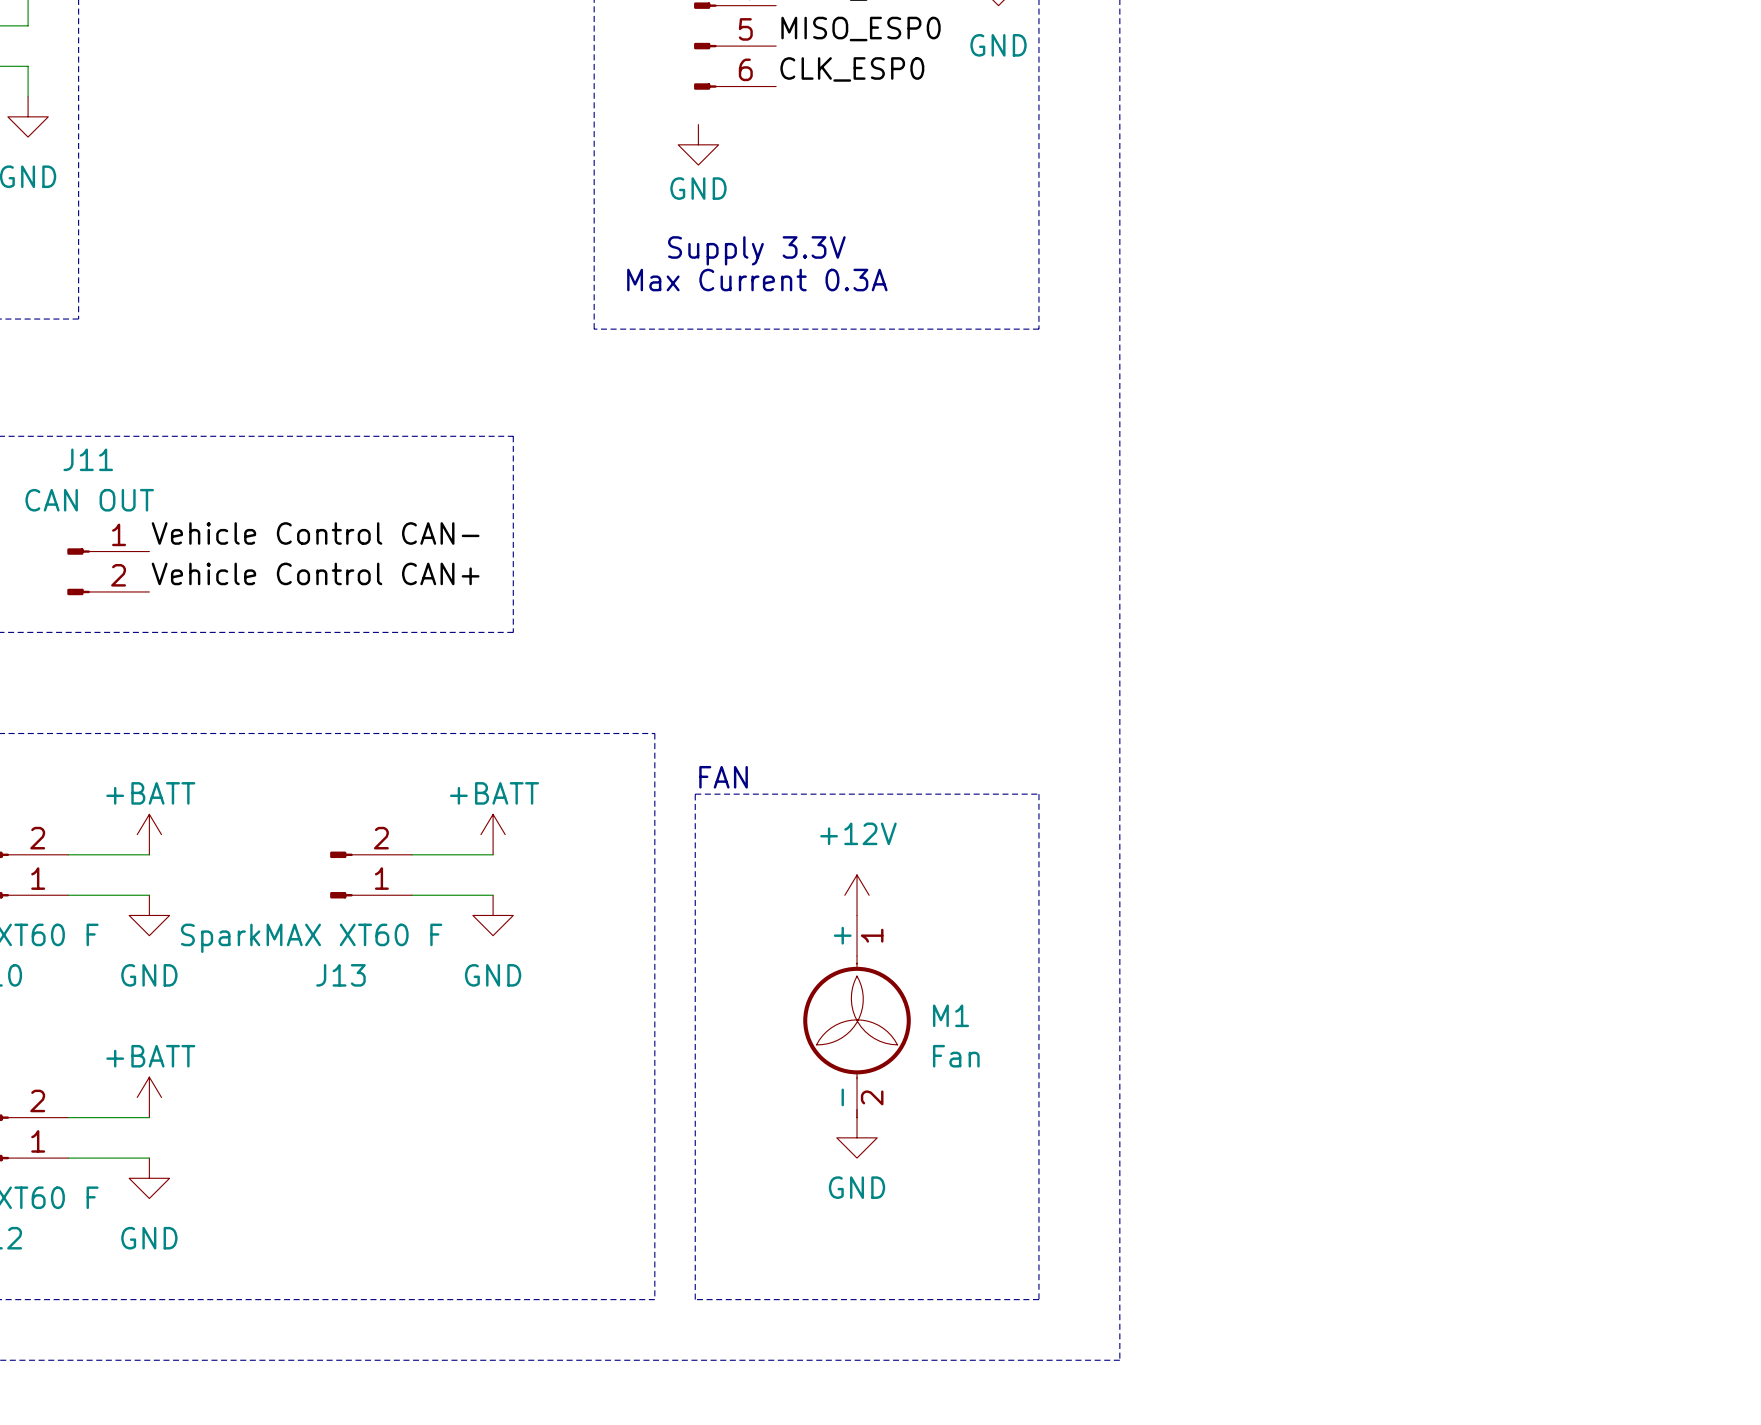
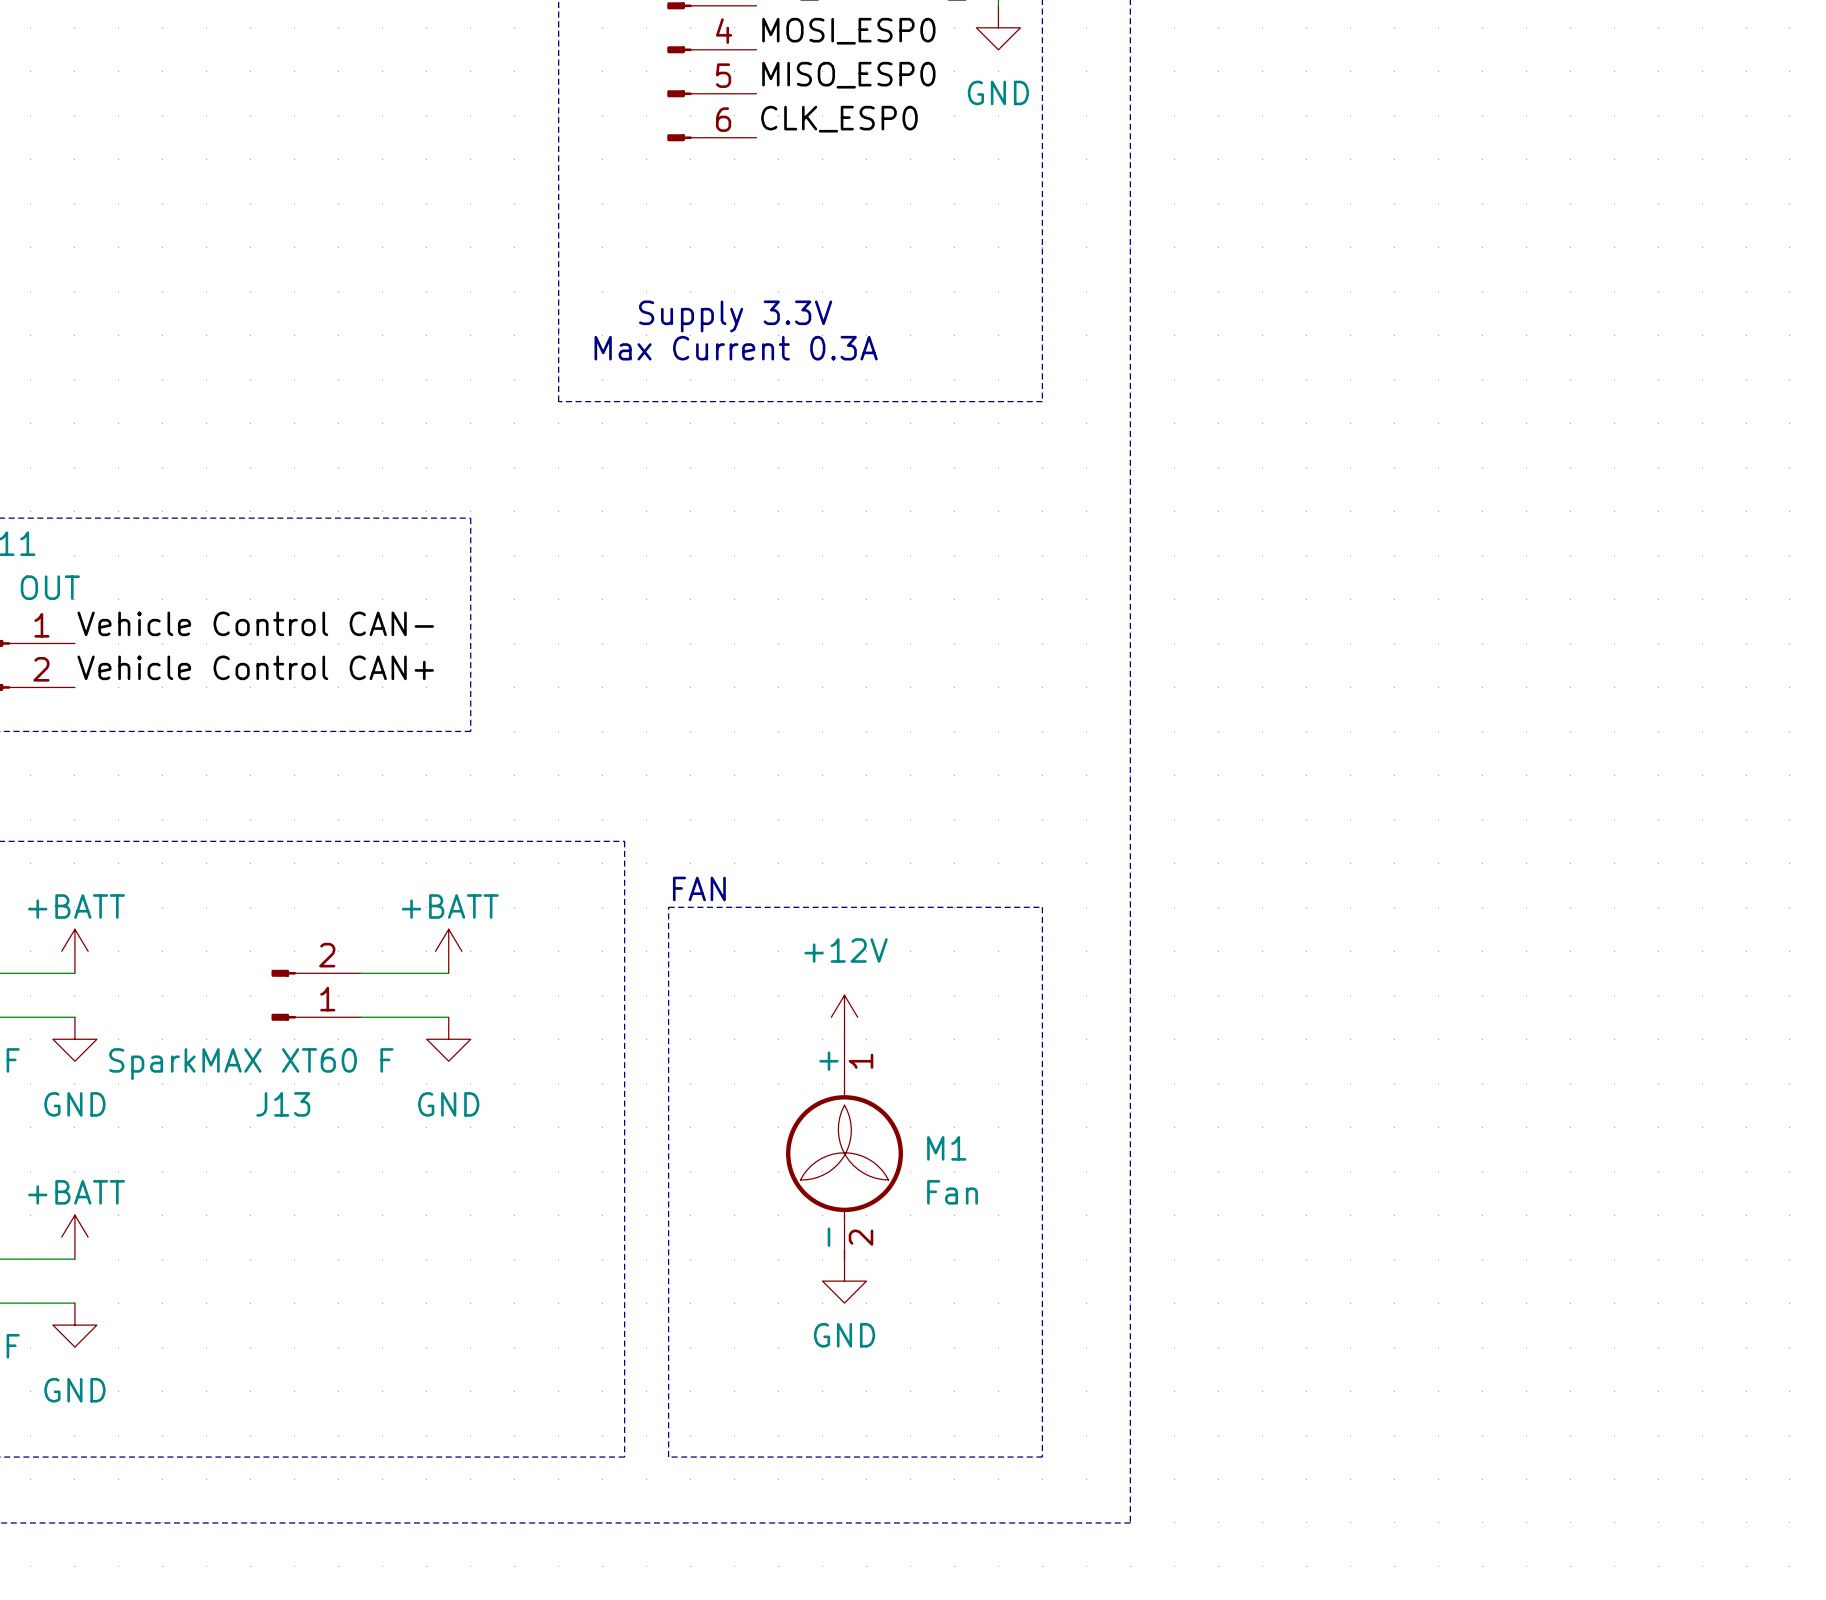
power symbol: GND (698, 144) -> none

